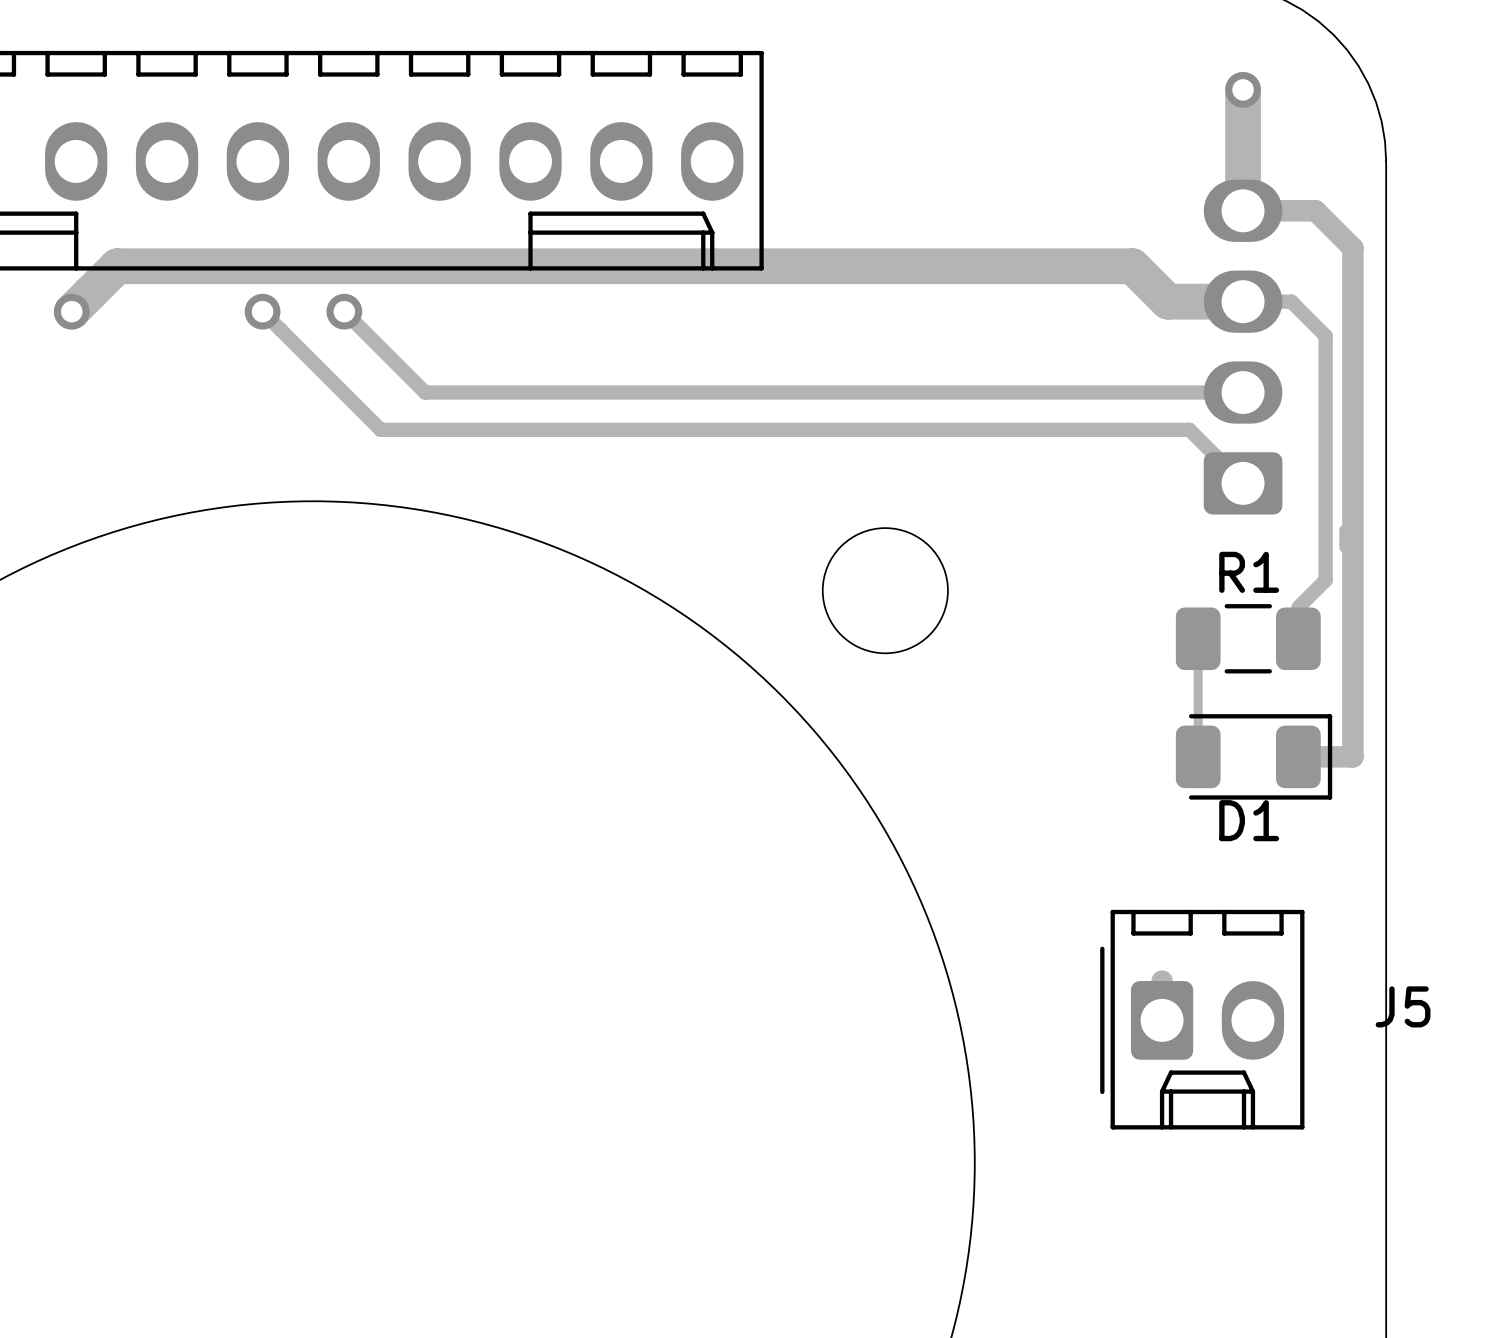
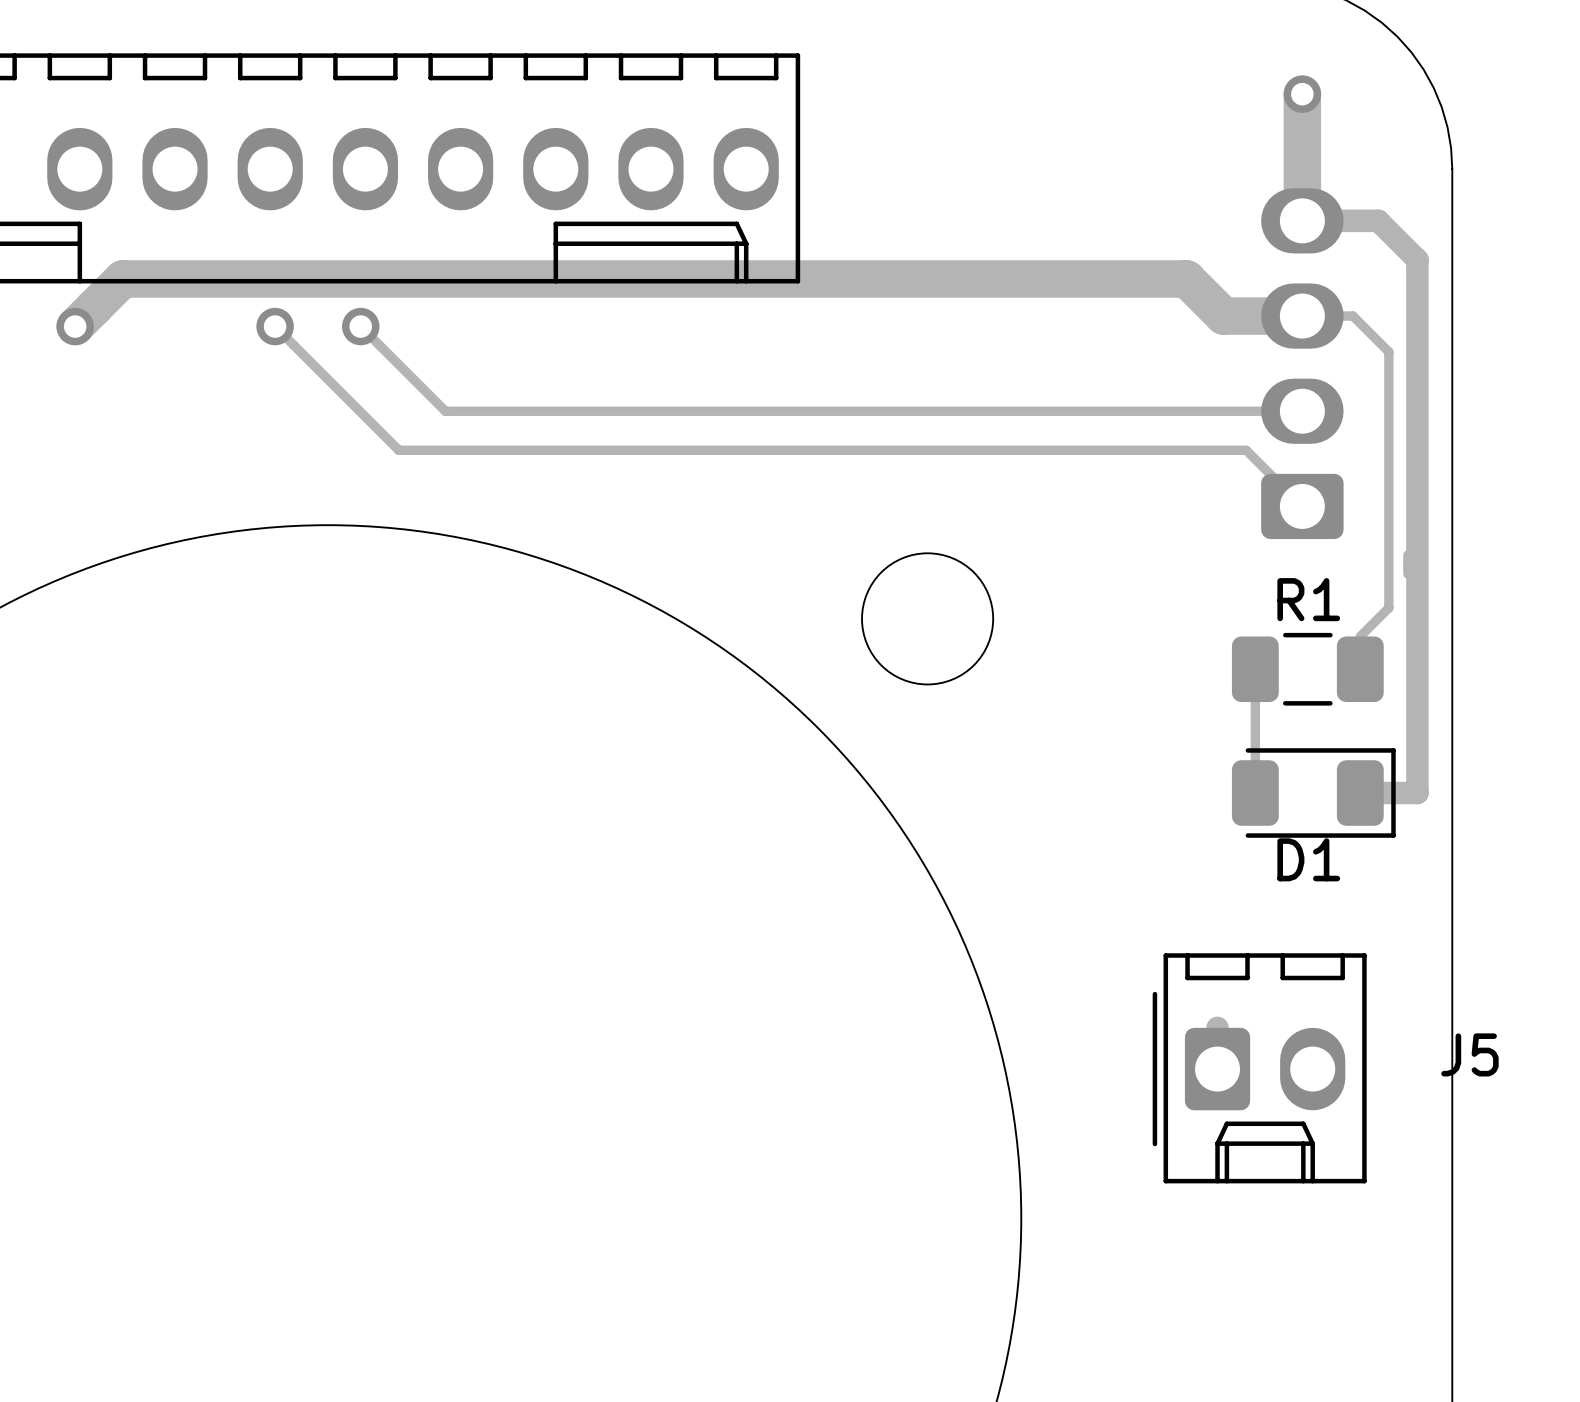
track width: thick (1243, 301) (1291, 301) (1325, 335) (1325, 580) (1298, 607) -> thin (1302, 316) (1352, 316) (1388, 351) (1388, 607) (1360, 636)
track width: thick (262, 311) (380, 429) (1189, 429) (1243, 483) -> thin (275, 326) (398, 450) (1246, 450) (1302, 506)
track width: thick (344, 311) (425, 392) (1243, 392) -> thin (360, 326) (445, 411) (1302, 411)

